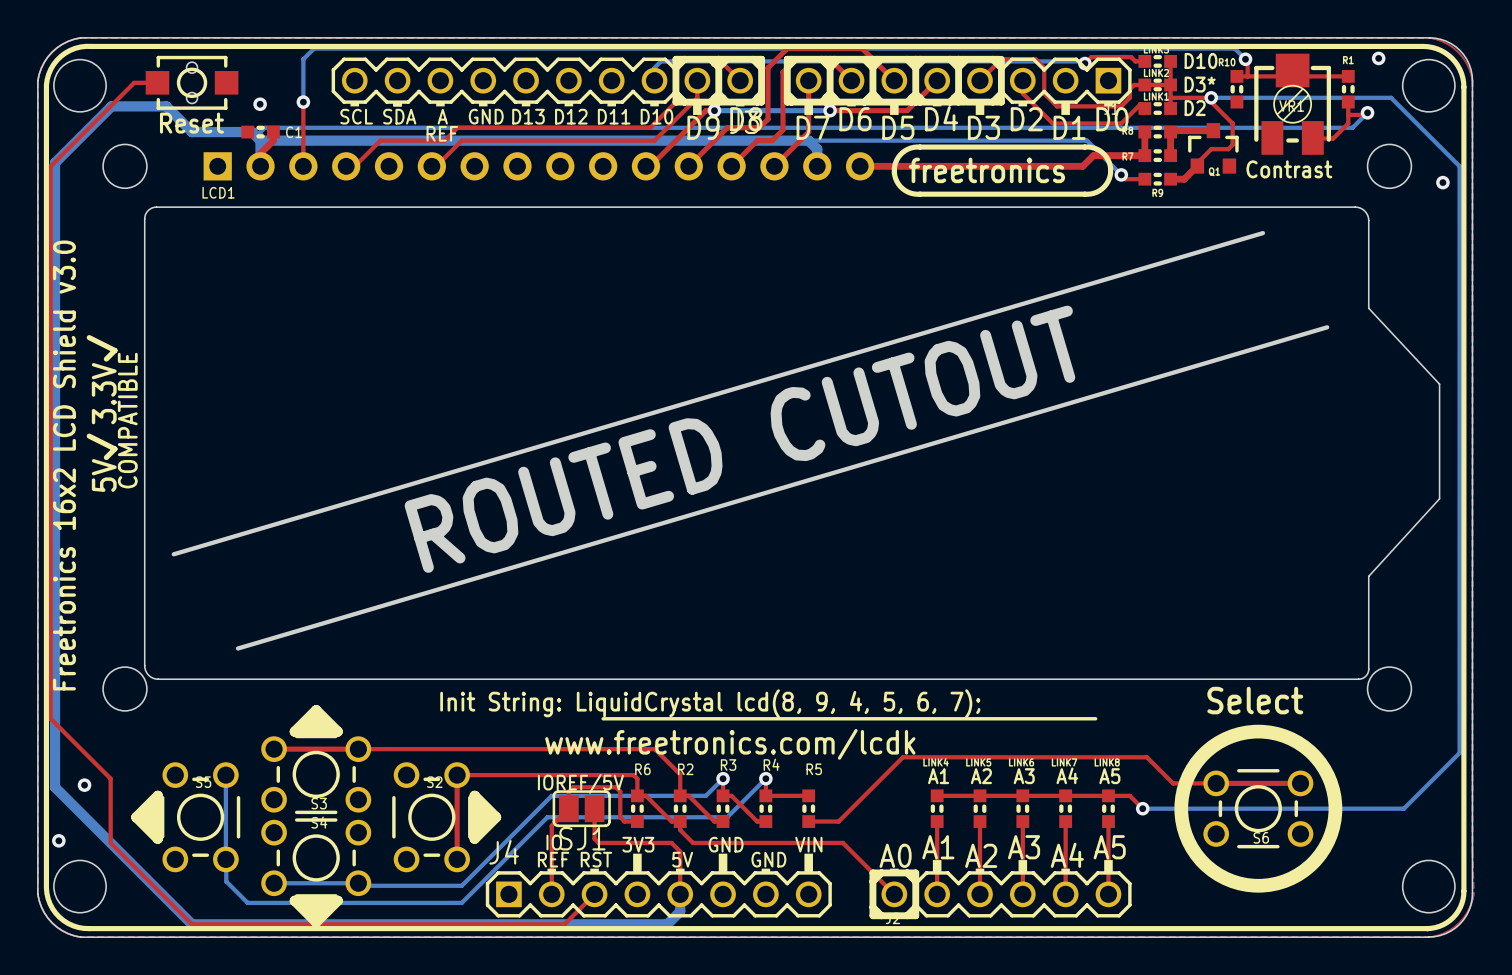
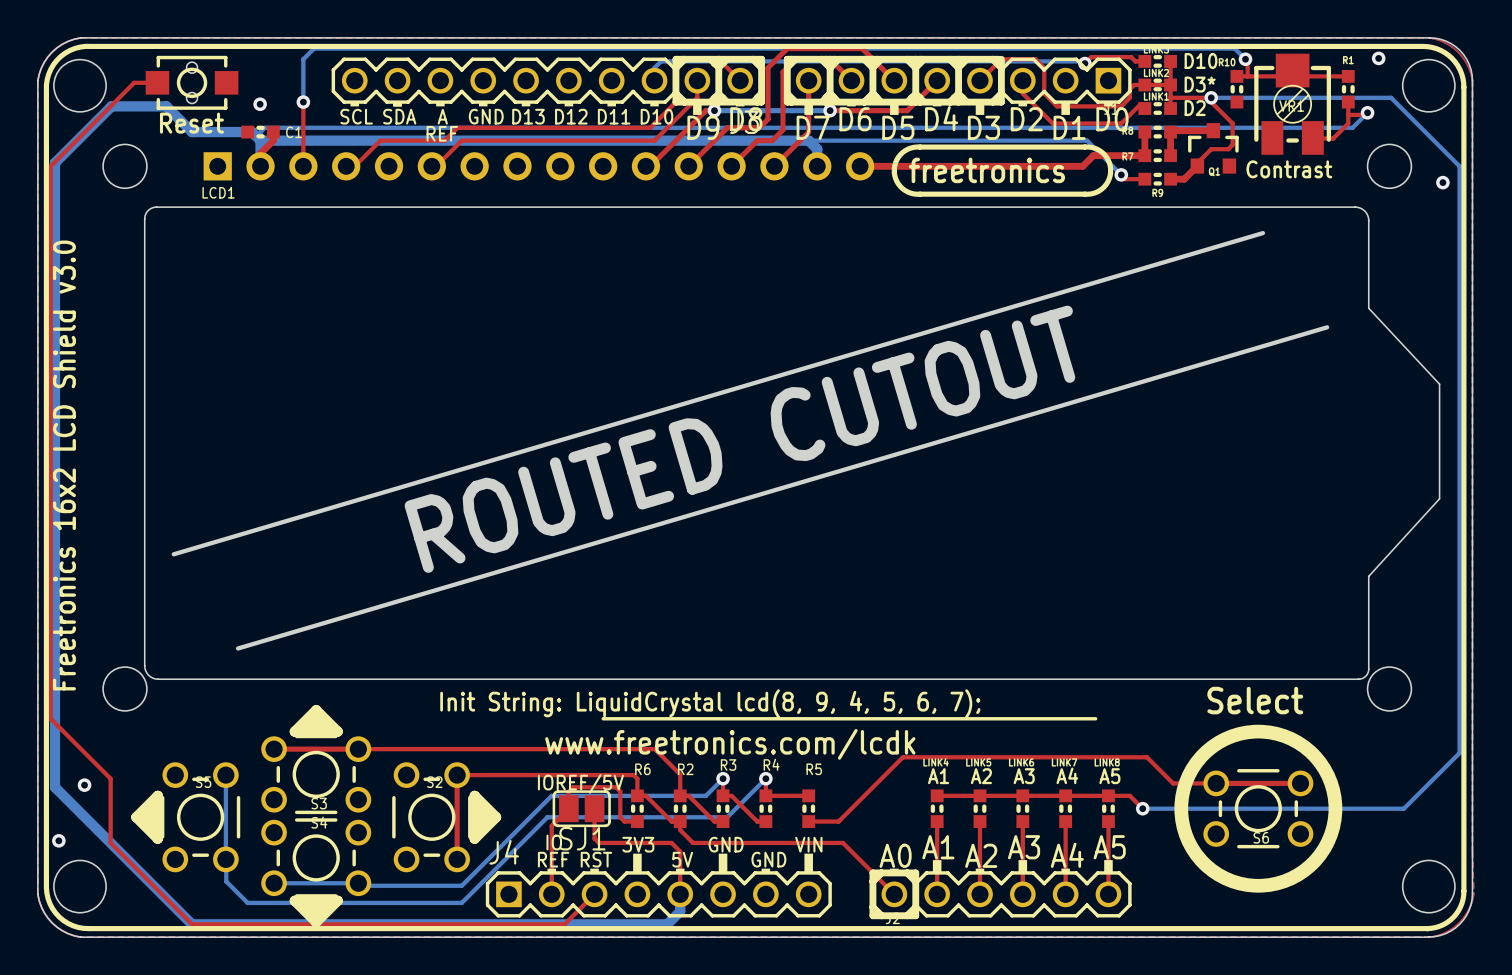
line: (89, 337) (114, 350) (106, 359) -> none
text: 3.3V (104, 393) -> none
text: COMPATIBLE (127, 420) -> none
line: (89, 436) (114, 448) (106, 457) -> none
text: 5V (104, 475) -> none

